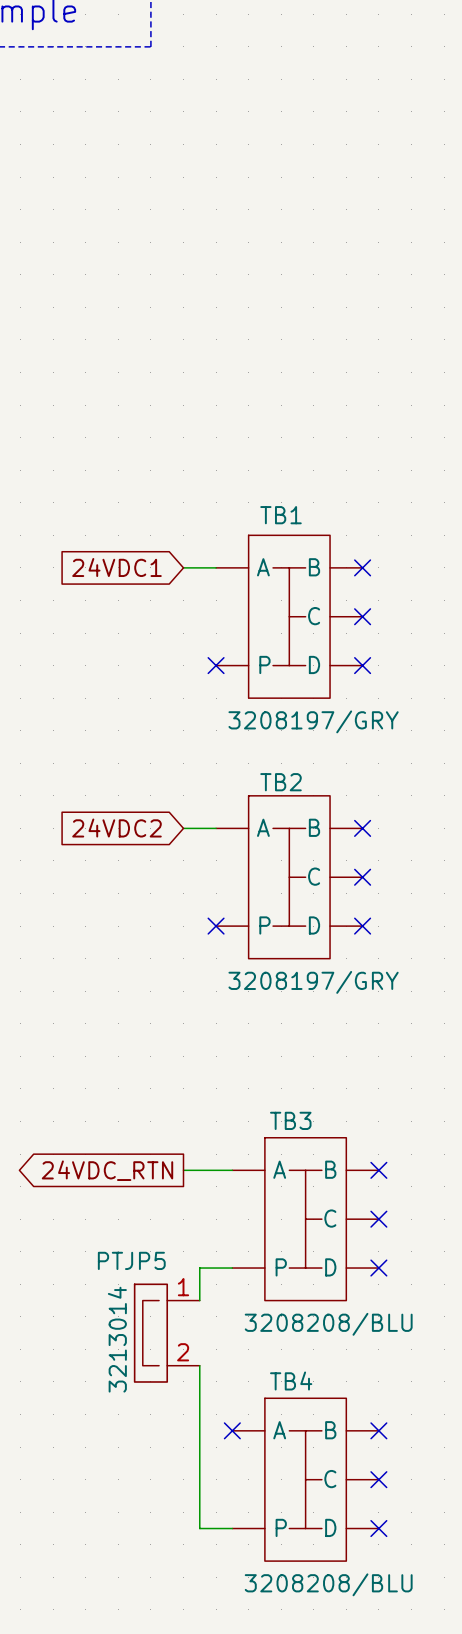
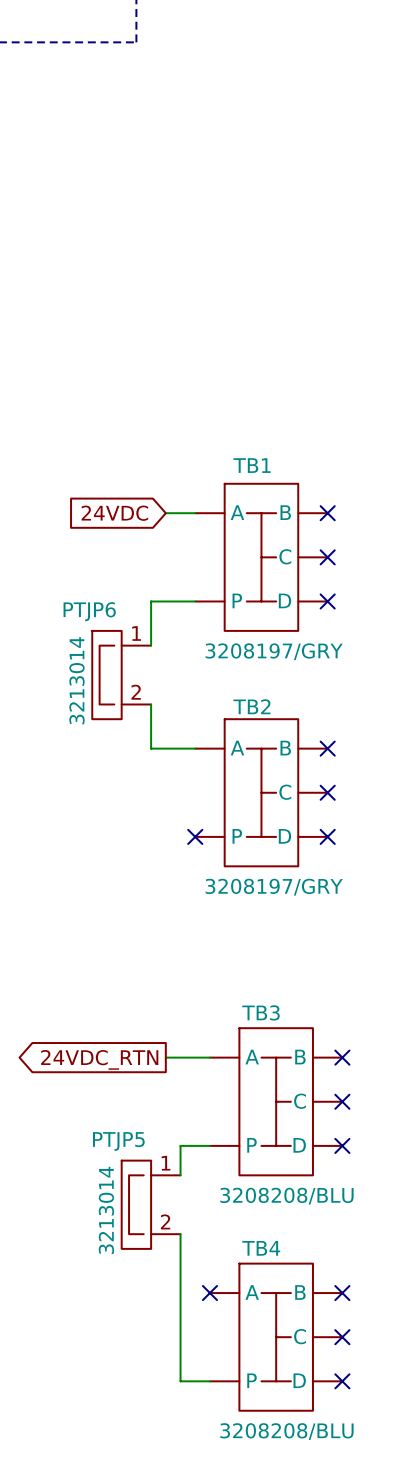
global label: 24VDC1 (116, 567) -> 24VDC (114, 513)
wire: none -> (195, 601) (151, 601) (151, 645)
no-connect mark: (216, 665) -> none
PTJP6: none -> 3213014 (121, 675)
wire: none -> (151, 704) (151, 748) (165, 748)
global label: 24VDC2 (116, 828) -> none

